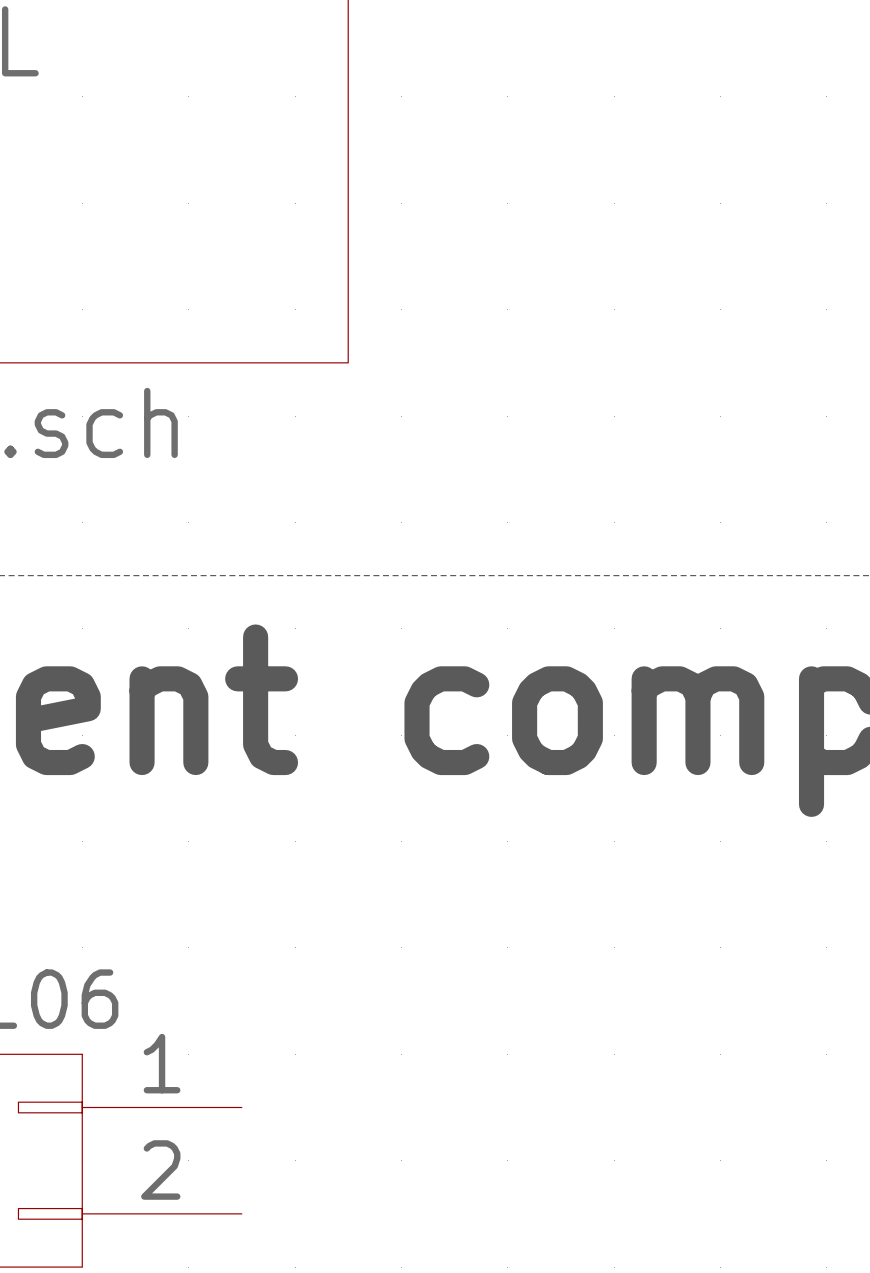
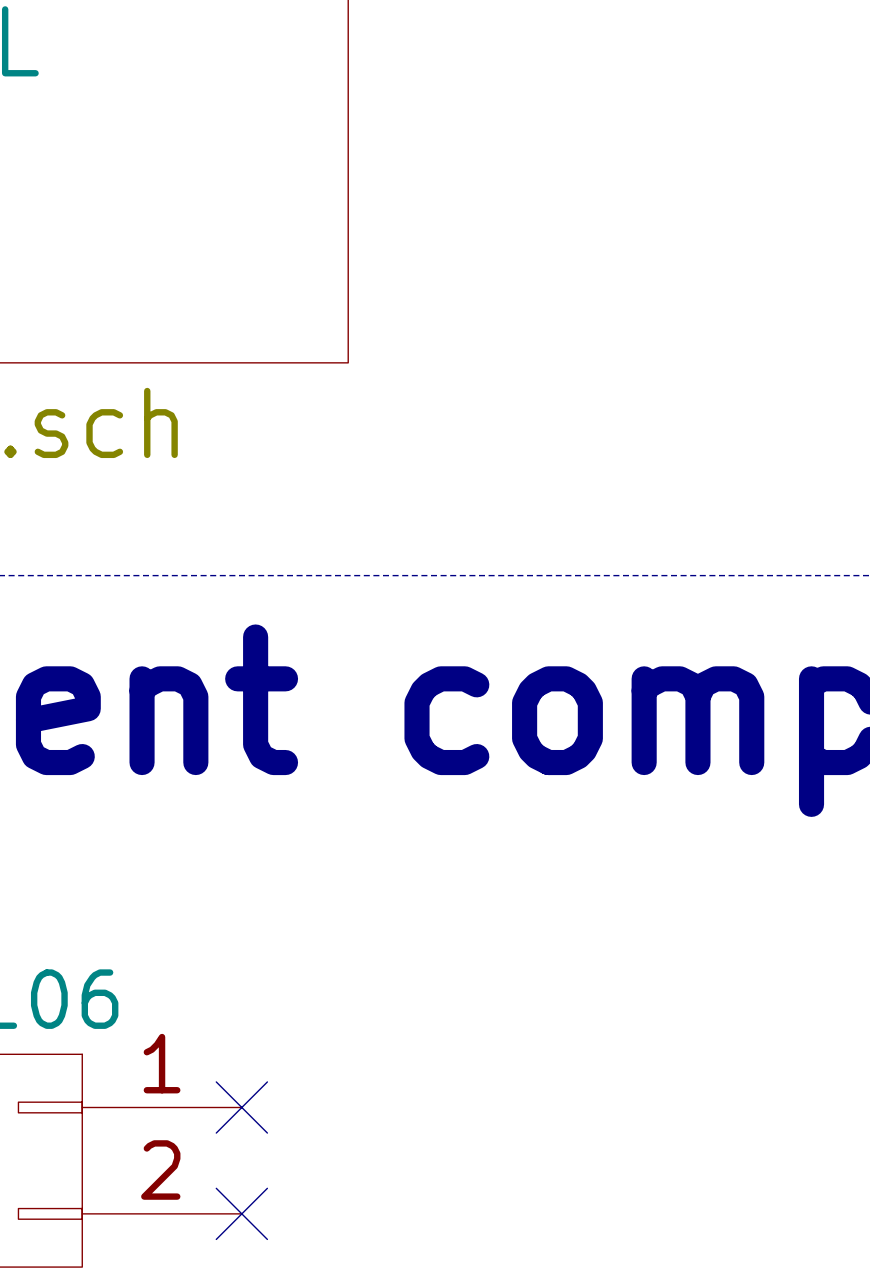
no-connect mark: none -> (241, 1107)
no-connect mark: none -> (241, 1213)

